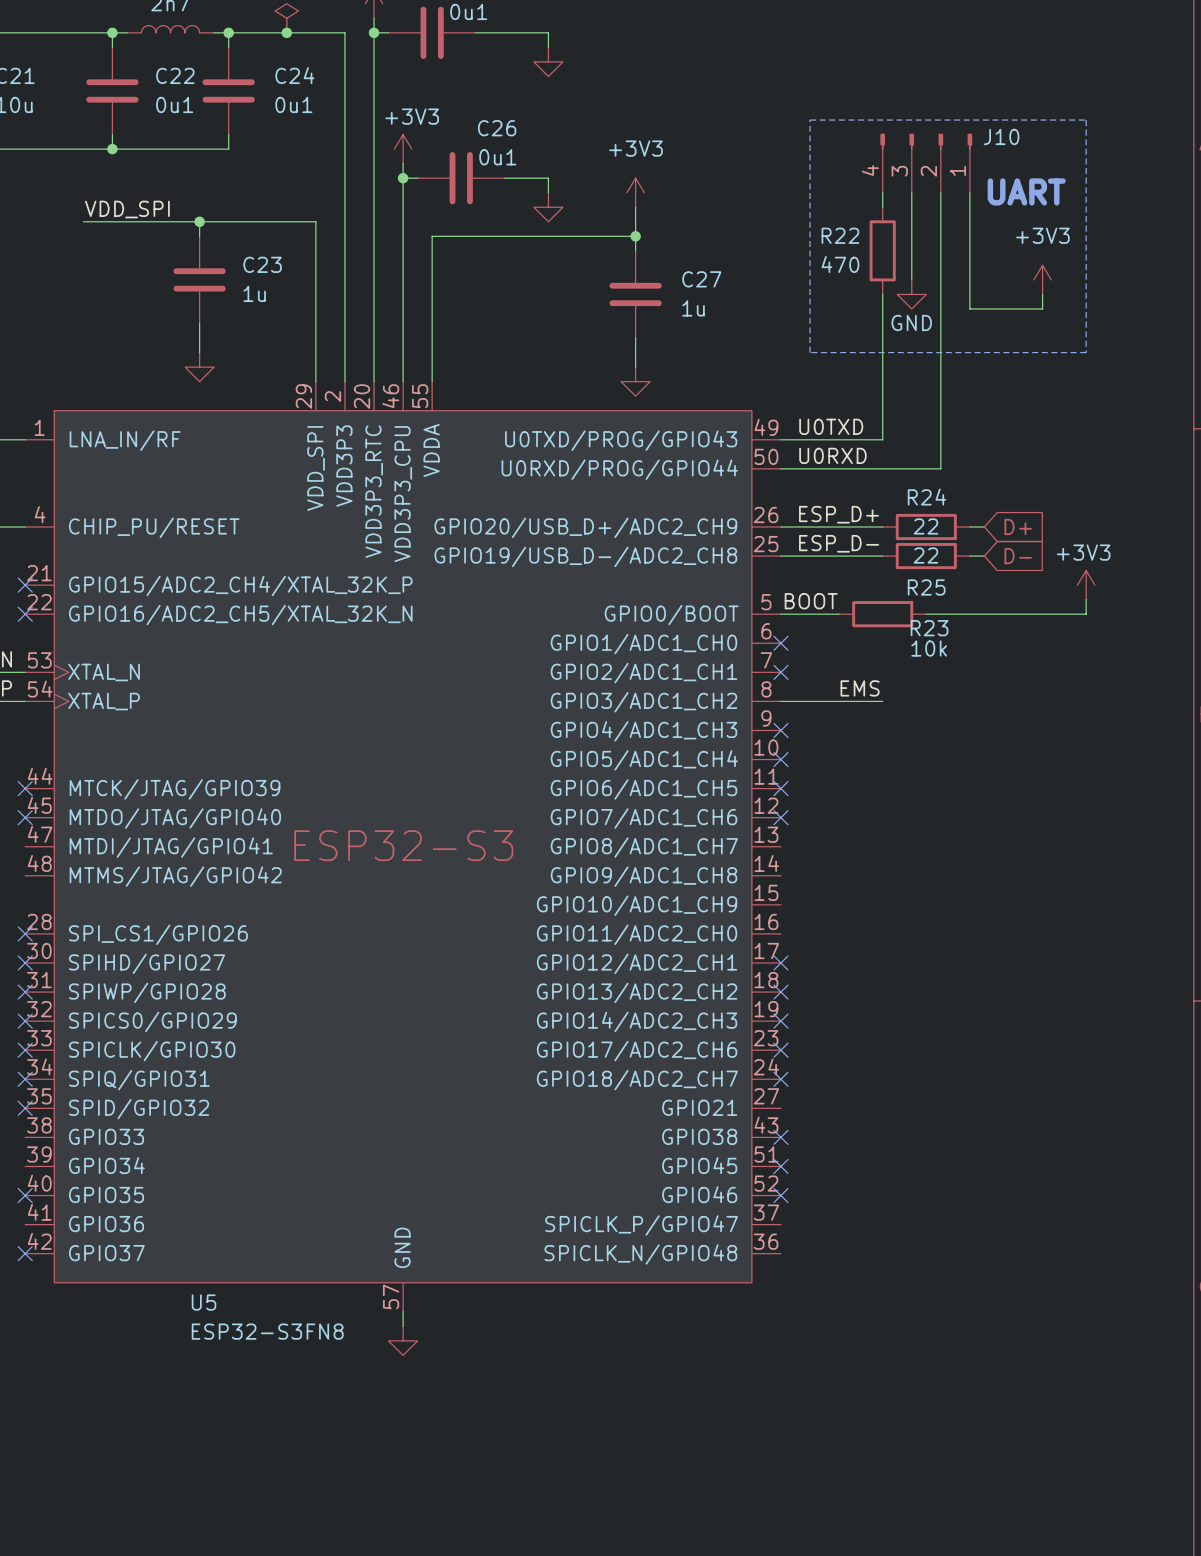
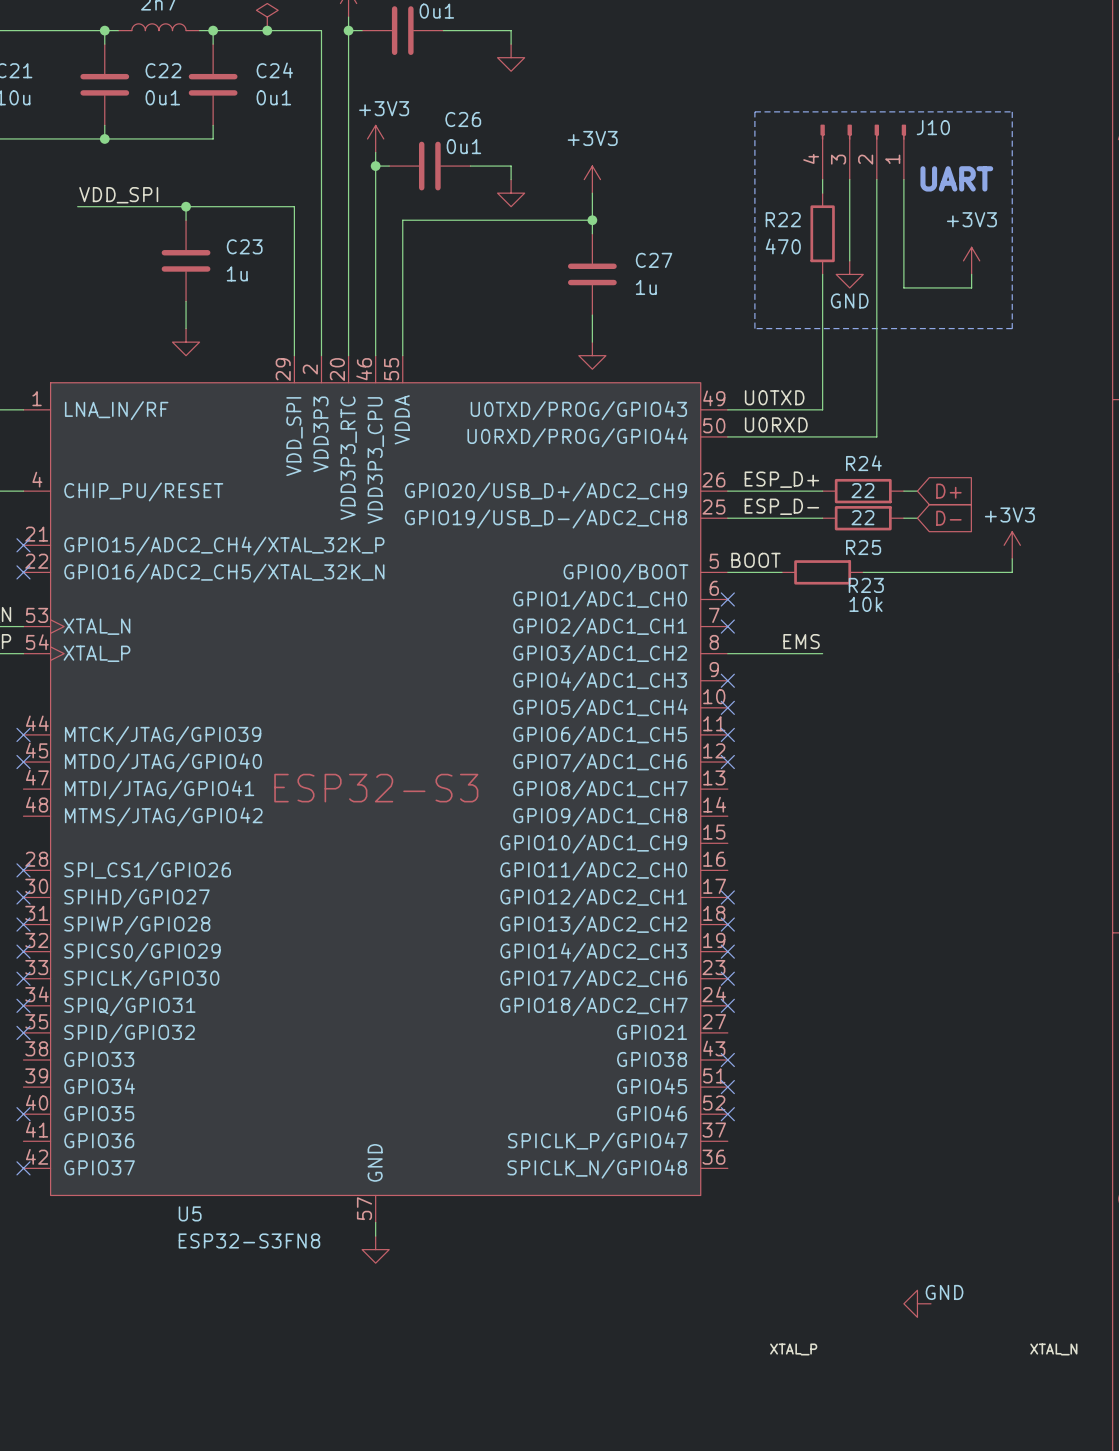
power symbol: none -> GND (917, 1303)
label: none -> XTAL_P (793, 1349)
label: none -> XTAL_N (1053, 1349)

